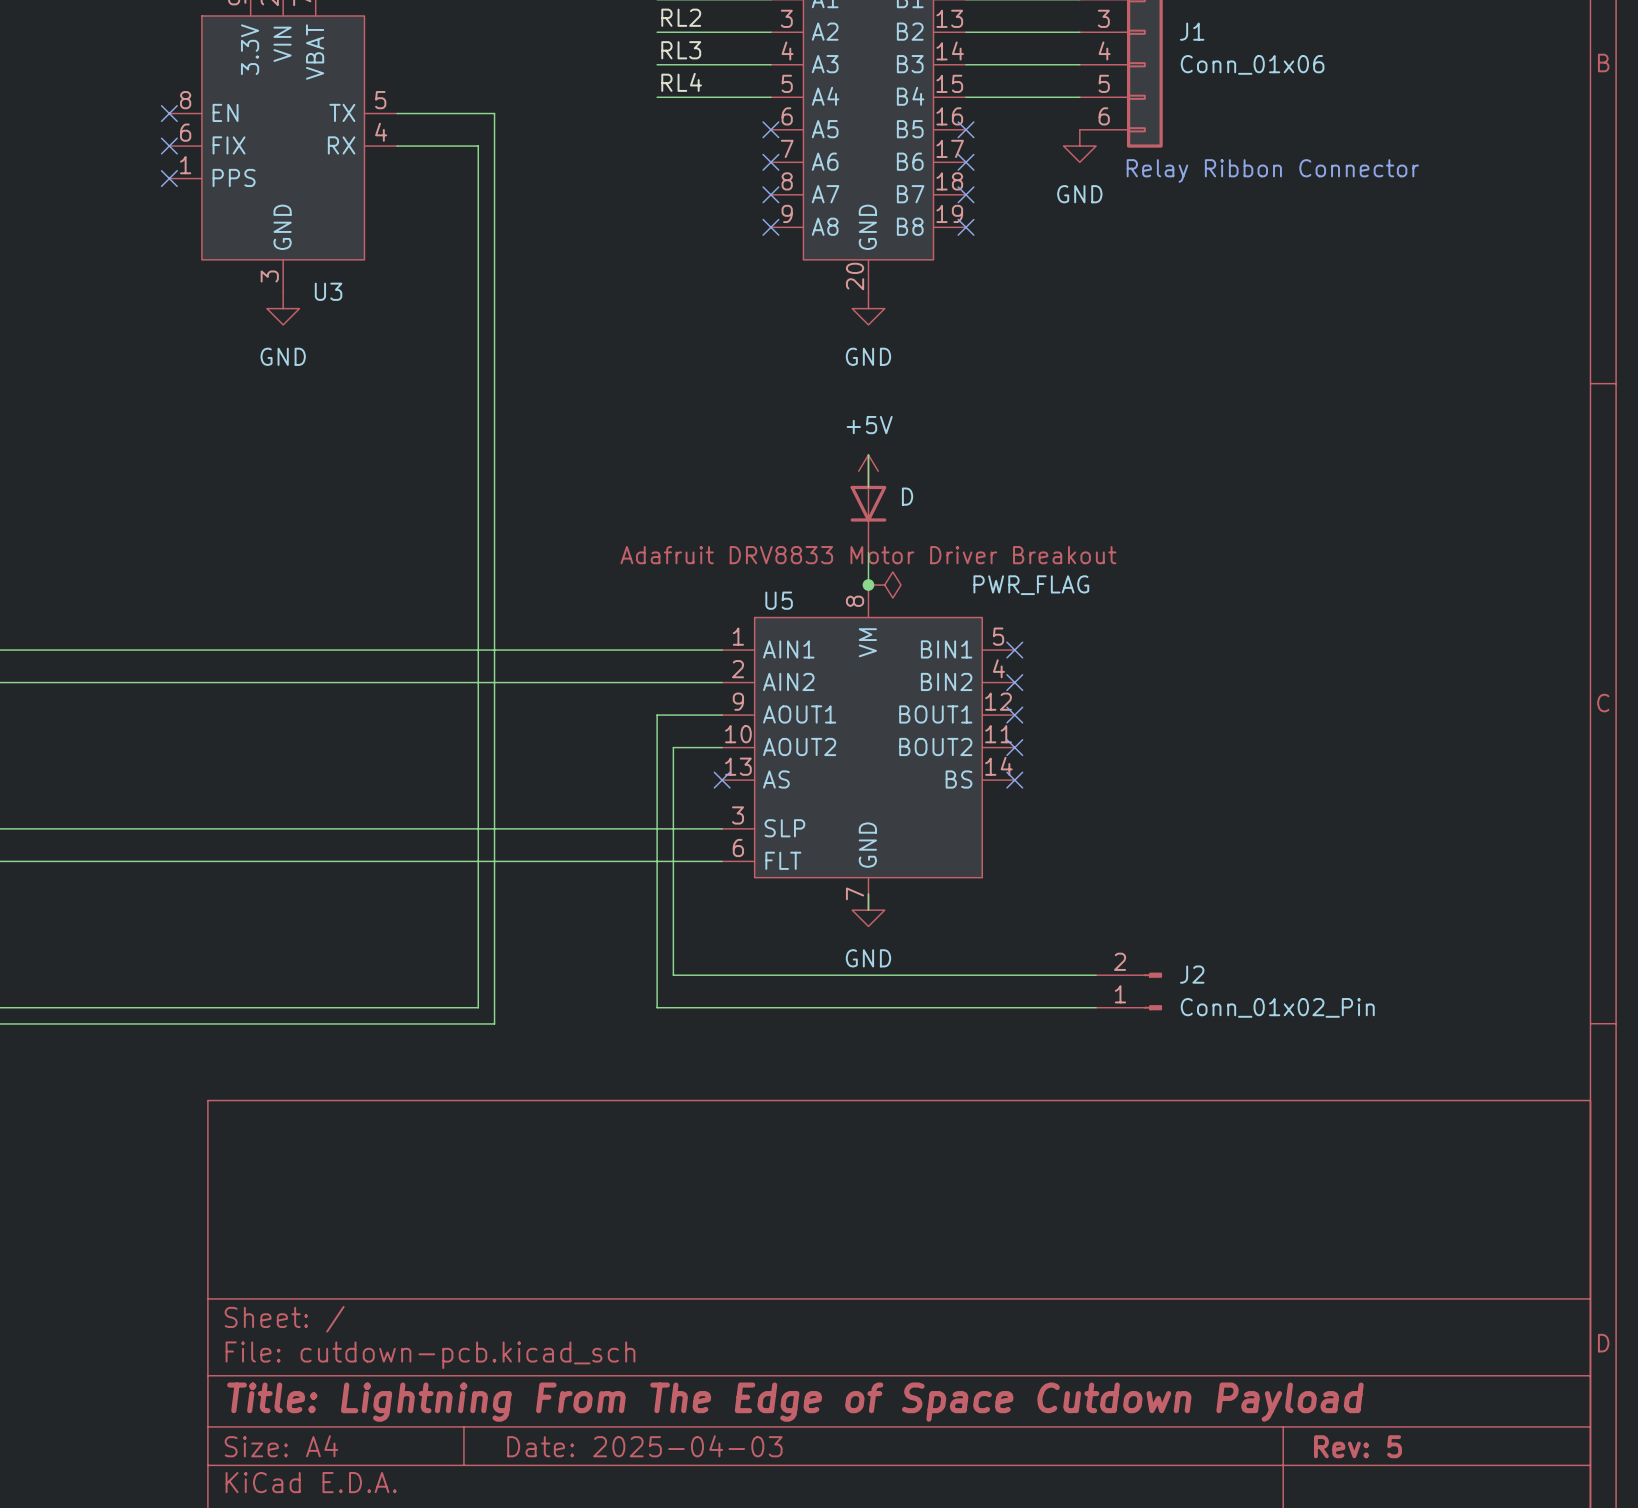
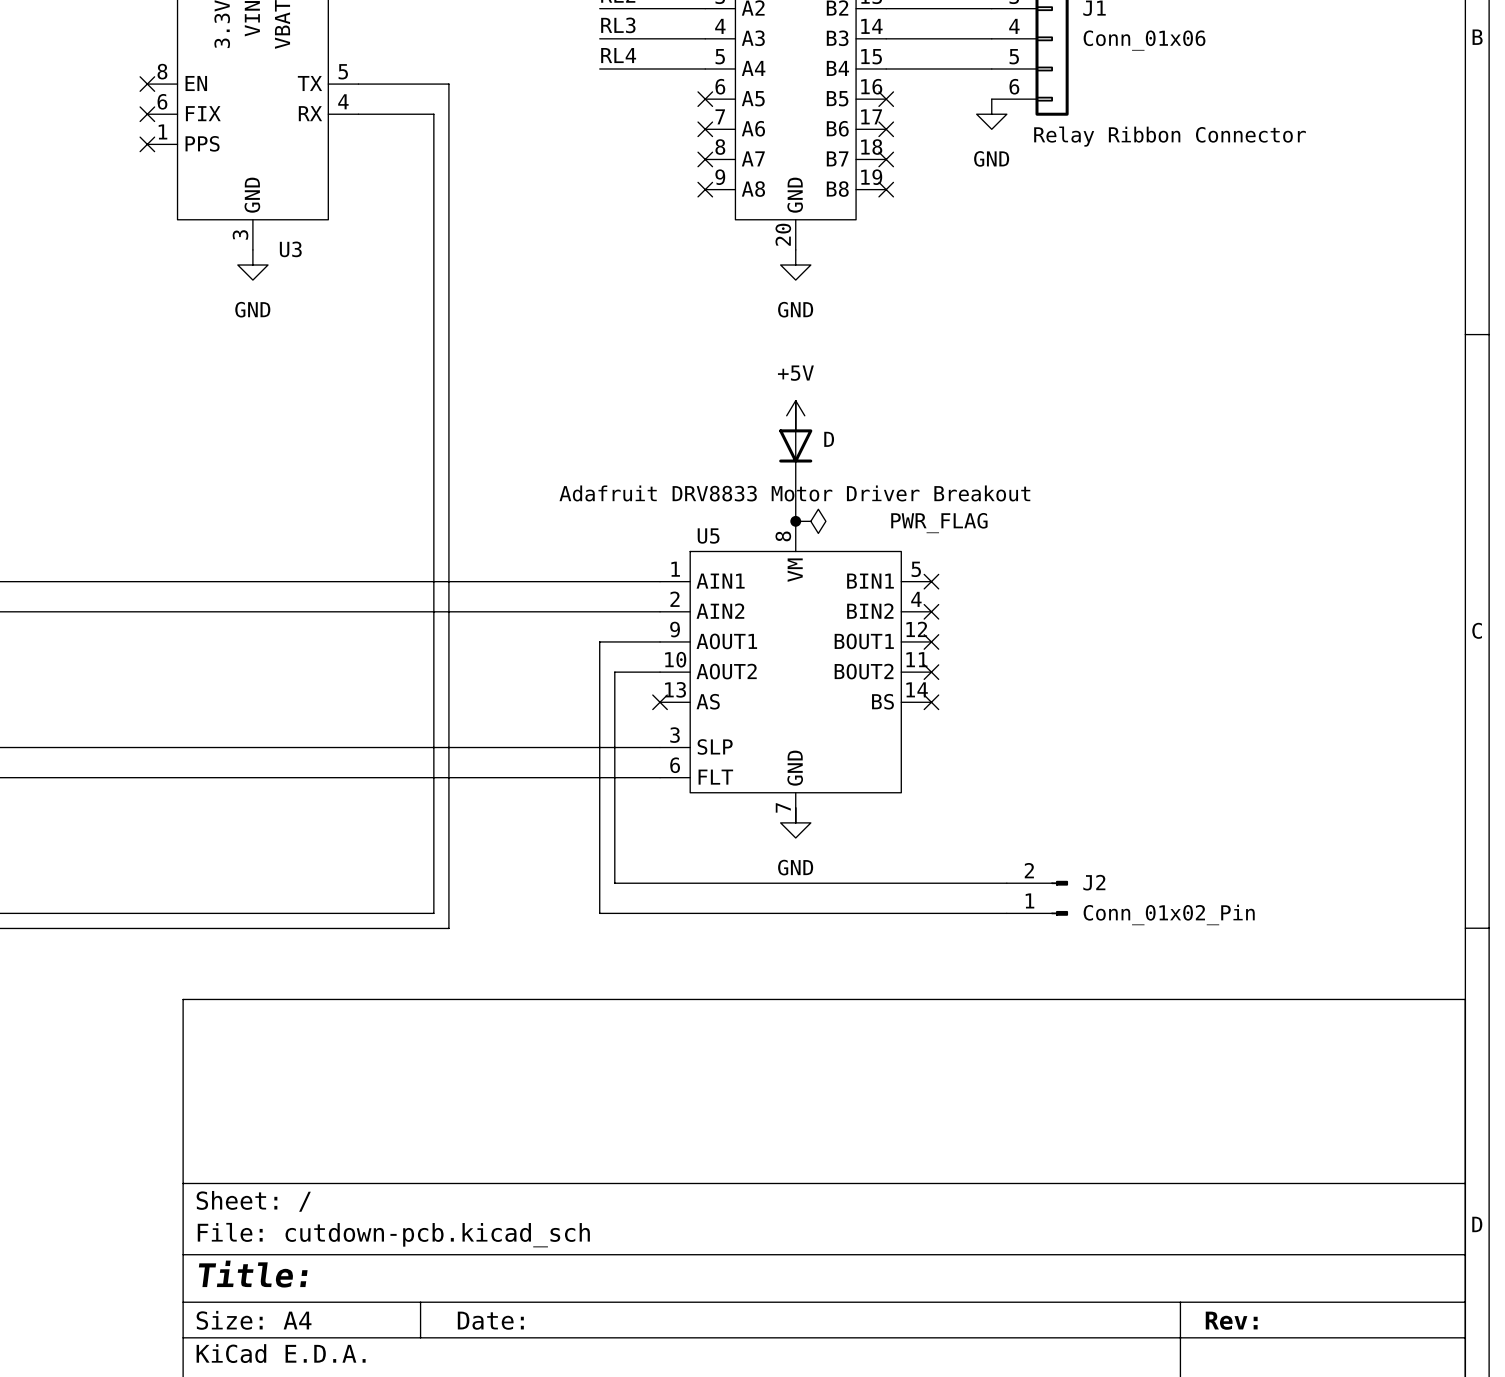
title block: Title: Lightning From The Edge of Space Cutdown Payload (795, 1402) -> Title: (253, 1274)
title block: Date: 2025-04-03 (644, 1446) -> Date: (490, 1320)
title block: Rev: 5 (1358, 1446) -> Rev: (1231, 1320)

